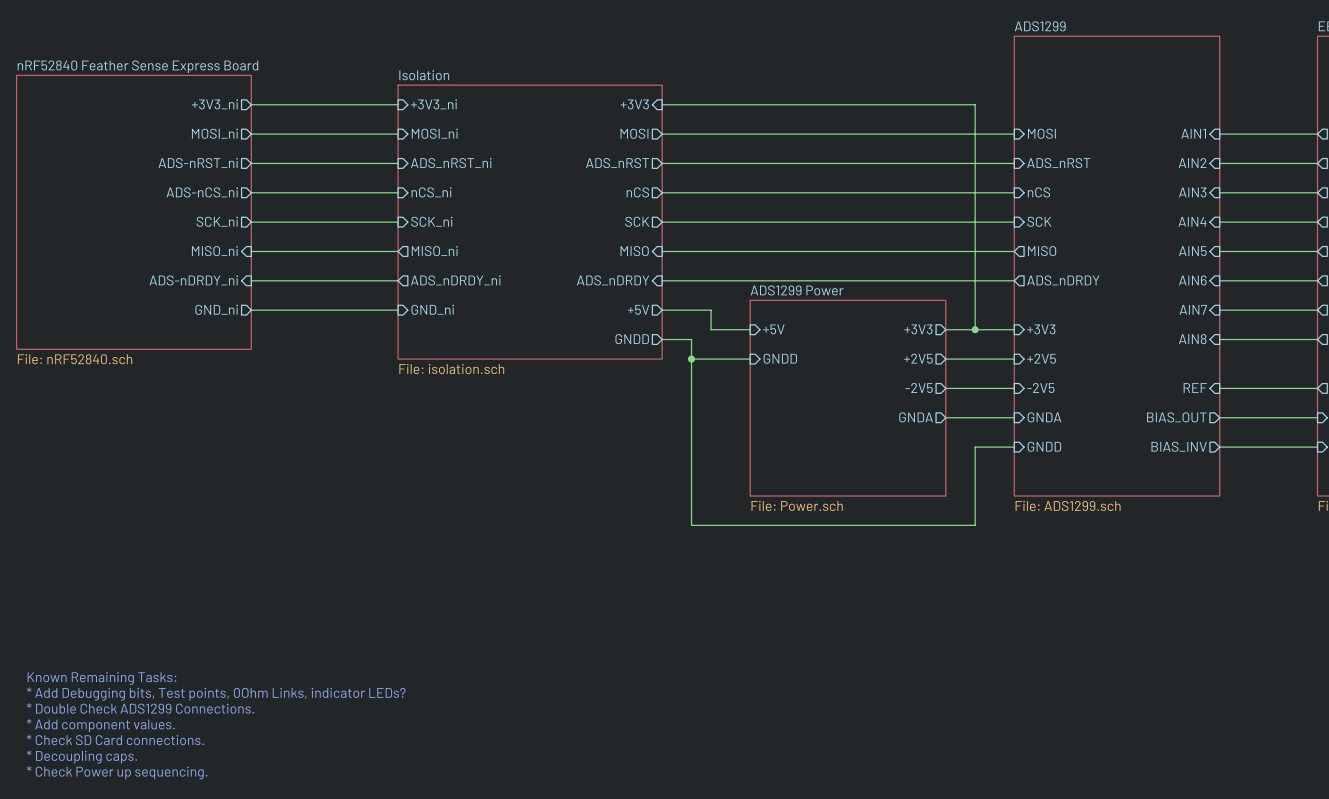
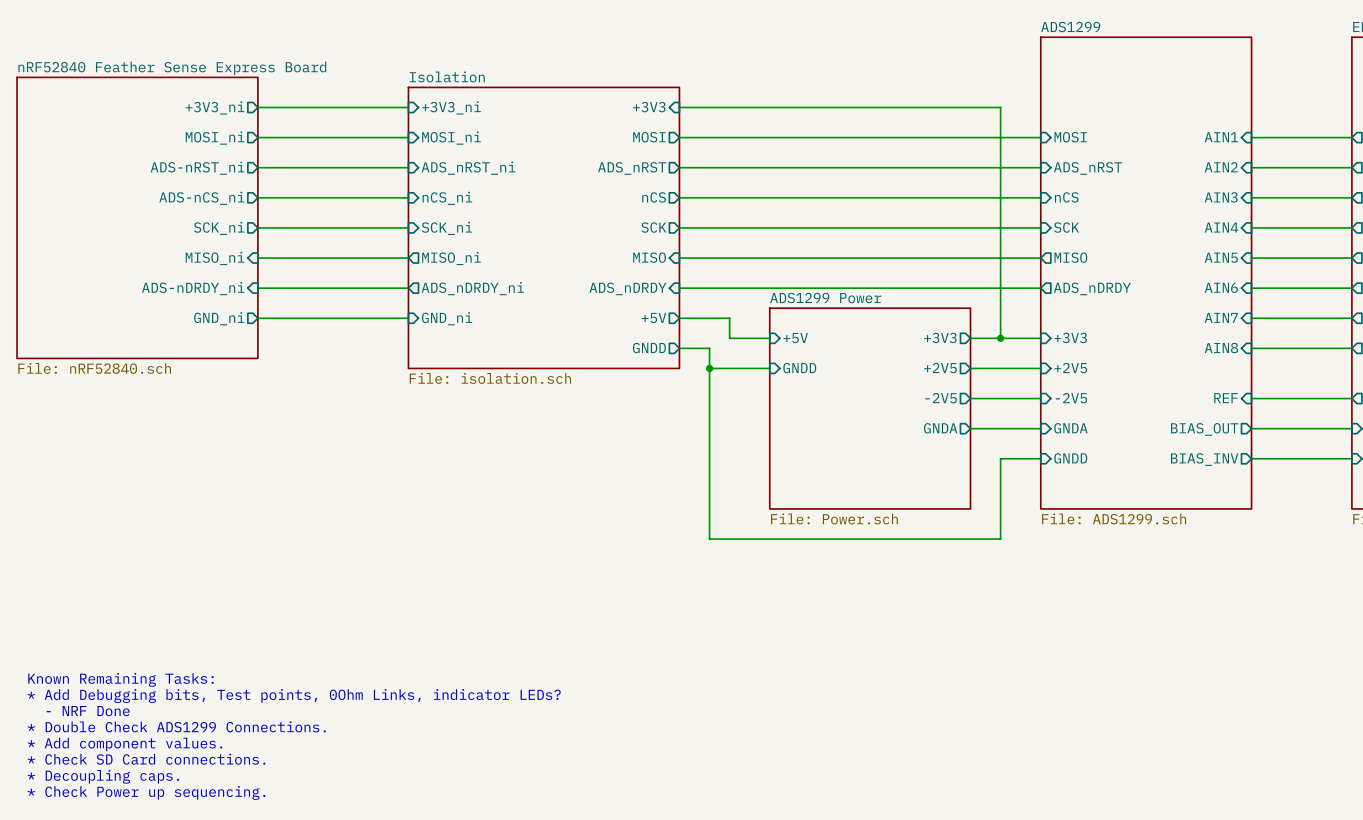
text: none -> Known Remaining Tasks: (120, 679)
text: Known Remaining Tasks: (101, 678) -> * Add Debugging bits, Test points, 0Ohm Links, indicator LEDs? (294, 696)
text: * Add Debugging bits, Test points, 0Ohm Links, indicator LEDs? (216, 693) -> - NRF Done (88, 711)

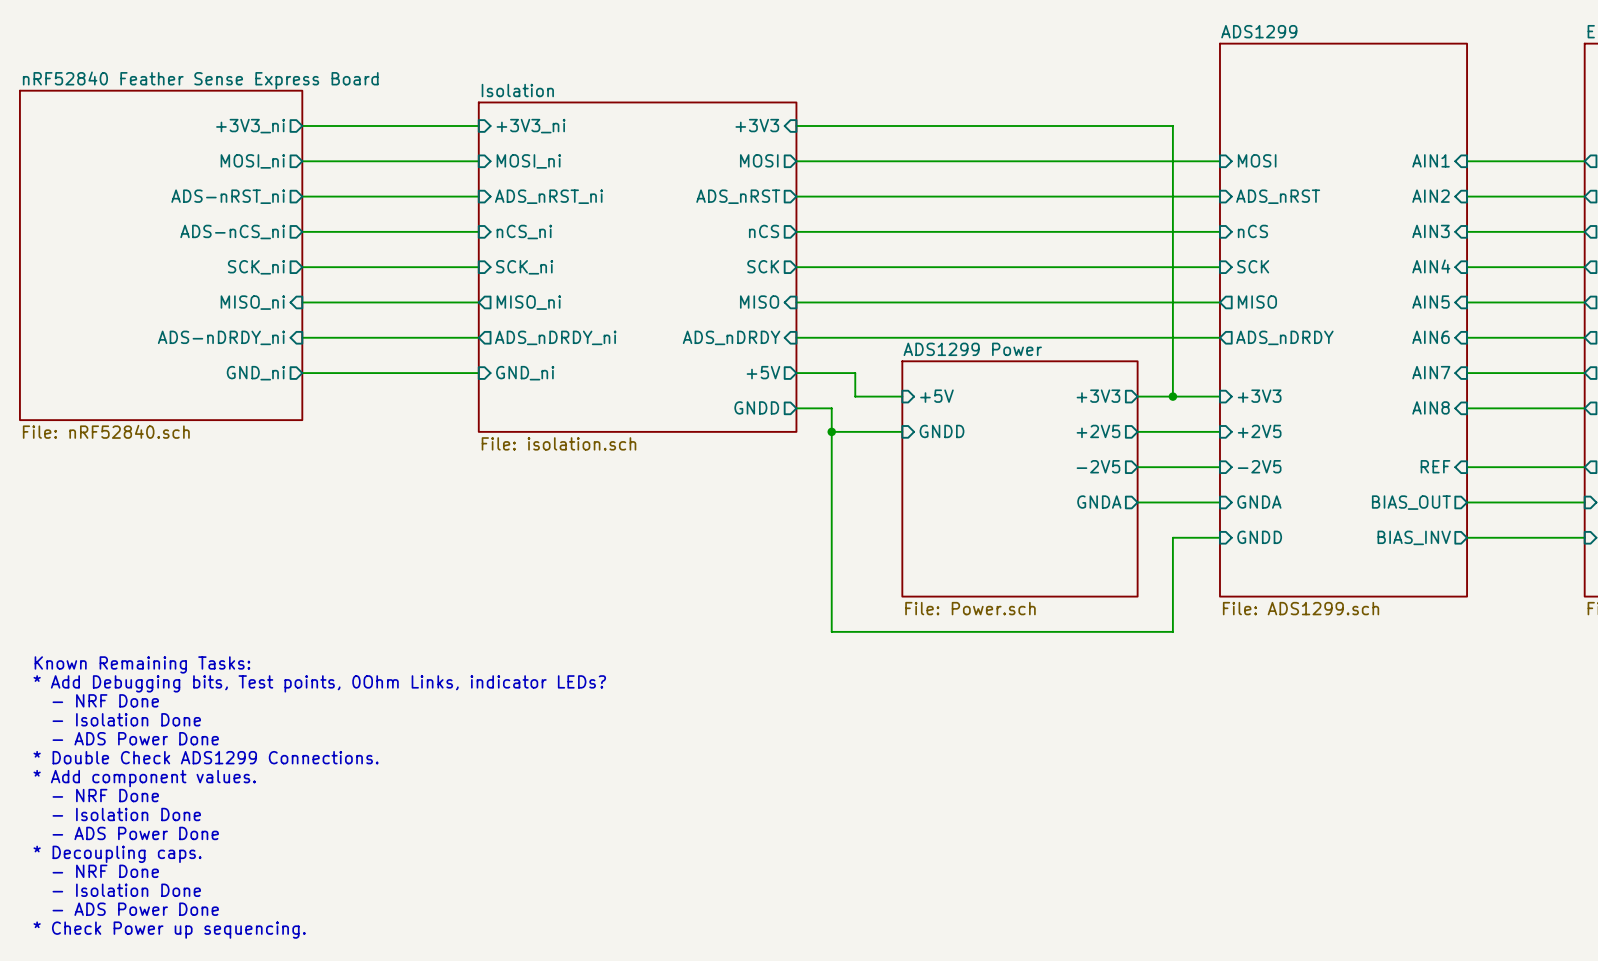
text: none -> Known Remaining Tasks: (142, 664)
text: none -> * Add Debugging bits, Test points, 0Ohm Links, indicator LEDs? (319, 683)
text: none -> - NRF Done (105, 700)
text: none -> - Isolation Done (126, 719)
text: none -> - ADS Power Done (135, 738)
text: none -> * Double Check ADS1299 Connections. (206, 757)
text: none -> * Add component values. (144, 778)
text: Known Remaining Tasks: (120, 679) -> - NRF Done (105, 795)
text: * Add Debugging bits, Test points, 0Ohm Links, indicator LEDs? (294, 696) -> - Isolation Done (126, 814)
text: - NRF Done (88, 711) -> - ADS Power Done (135, 833)
text: * Double Check ADS1299 Connections. (176, 726) -> * Decoupling caps. (117, 854)
text: * Add component values. (124, 744) -> - NRF Done (105, 871)
text: * Check SD Card connections. (146, 759) -> - Isolation Done (126, 890)
text: * Decoupling caps. (103, 776) -> - ADS Power Done (135, 909)

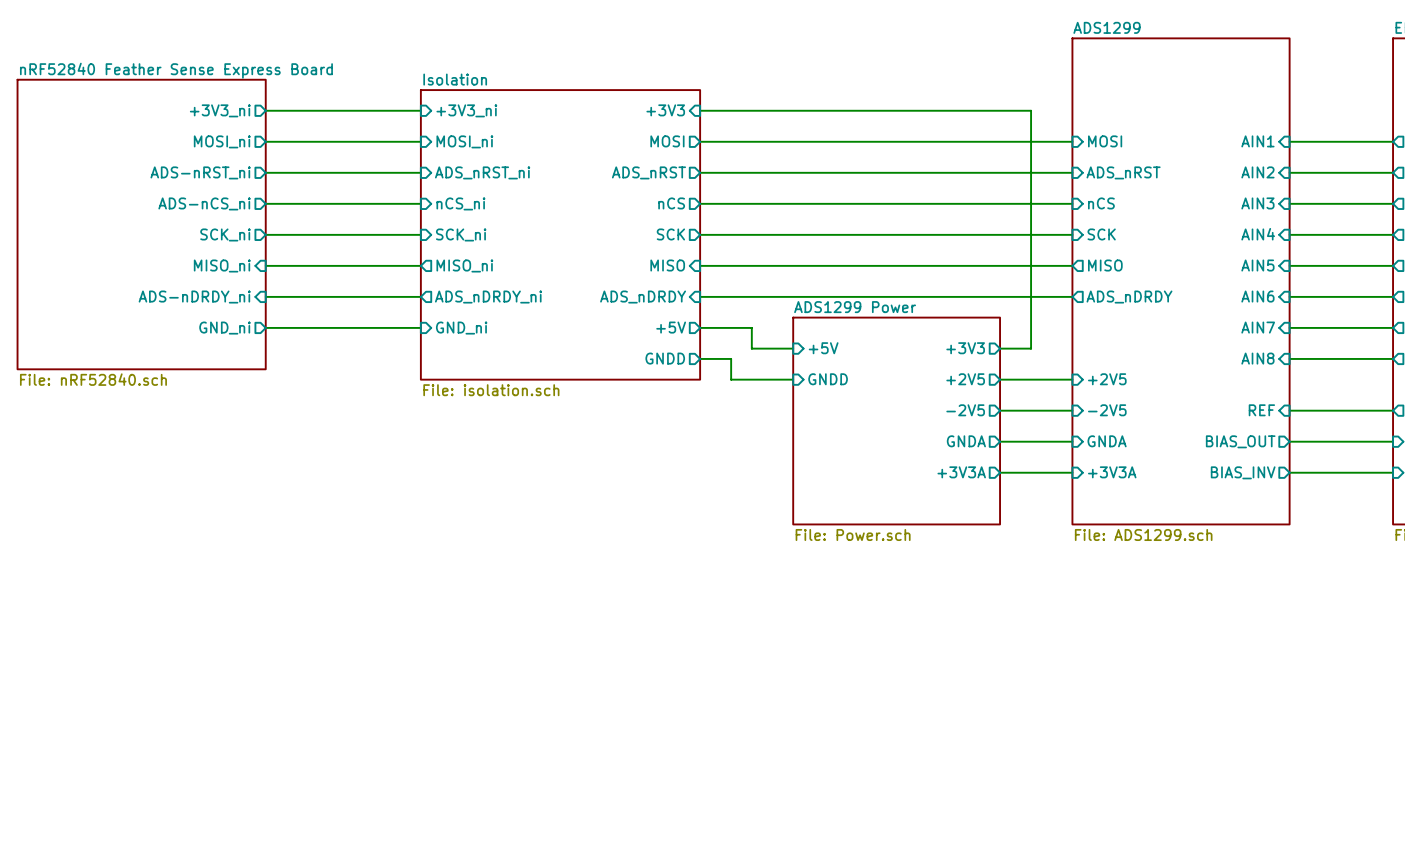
wire: (1172, 396) (1219, 396) -> none
junction: (1172, 396) -> none
sheet pin: +3V3 (1259, 396) -> none
wire: (831, 431) (831, 631) (1172, 631) (1172, 537) -> (1000, 472) (1031, 472)
junction: (831, 431) -> none
sheet pin: none -> +3V3A (961, 472)
sheet pin: GNDD (1259, 537) -> +3V3A (1112, 472)
text: Known Remaining Tasks: (142, 664) -> none
text: * Add Debugging bits, Test points, 0Ohm Links, indicator LEDs? (319, 683) -> none
text: - NRF Done (105, 700) -> none
text: - Isolation Done (126, 719) -> none
text: - ADS Power Done (135, 738) -> none
text: * Double Check ADS1299 Connections. (206, 757) -> none
text: * Add component values. (144, 778) -> none
text: - NRF Done (105, 795) -> none
text: - Isolation Done (126, 814) -> none
text: - ADS Power Done (135, 833) -> none
text: * Decoupling caps. (117, 854) -> none
text: - NRF Done (105, 871) -> none
text: - Isolation Done (126, 890) -> none
text: - ADS Power Done (135, 909) -> none
text: * Check Power up sequencing. (169, 930) -> none

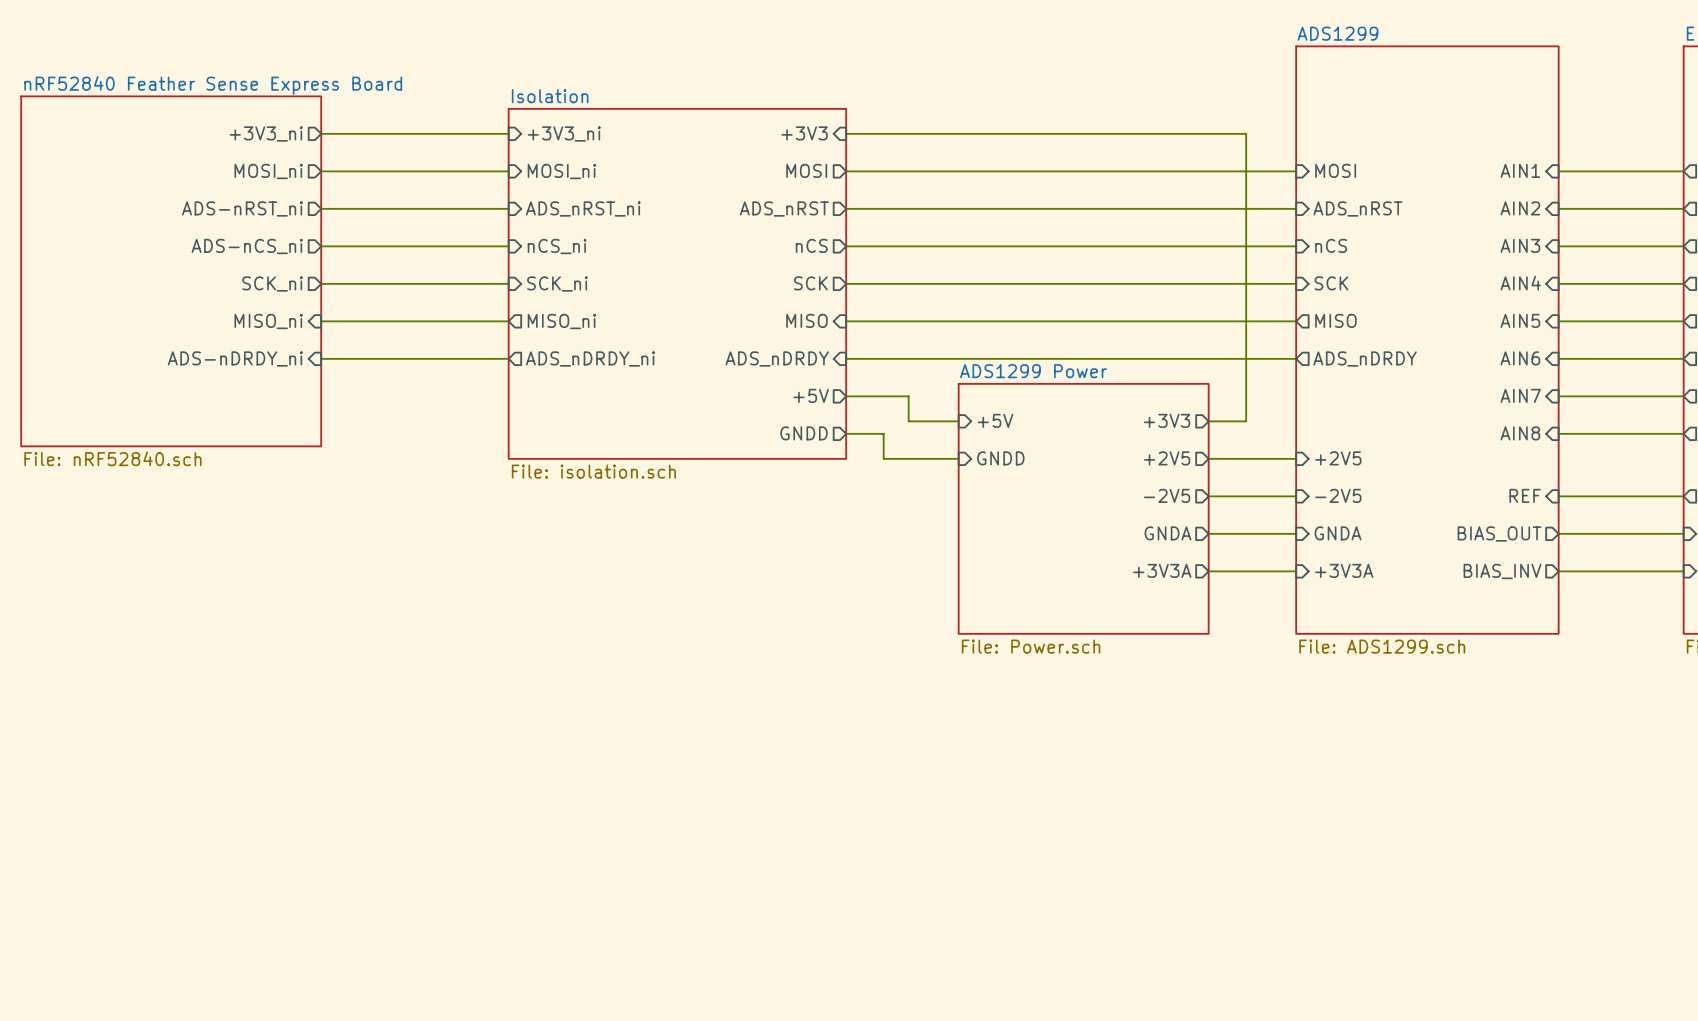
wire: (265, 327) (420, 327) -> none
sheet pin: GND_ni (224, 328) -> none
sheet pin: GND_ni (461, 328) -> none

